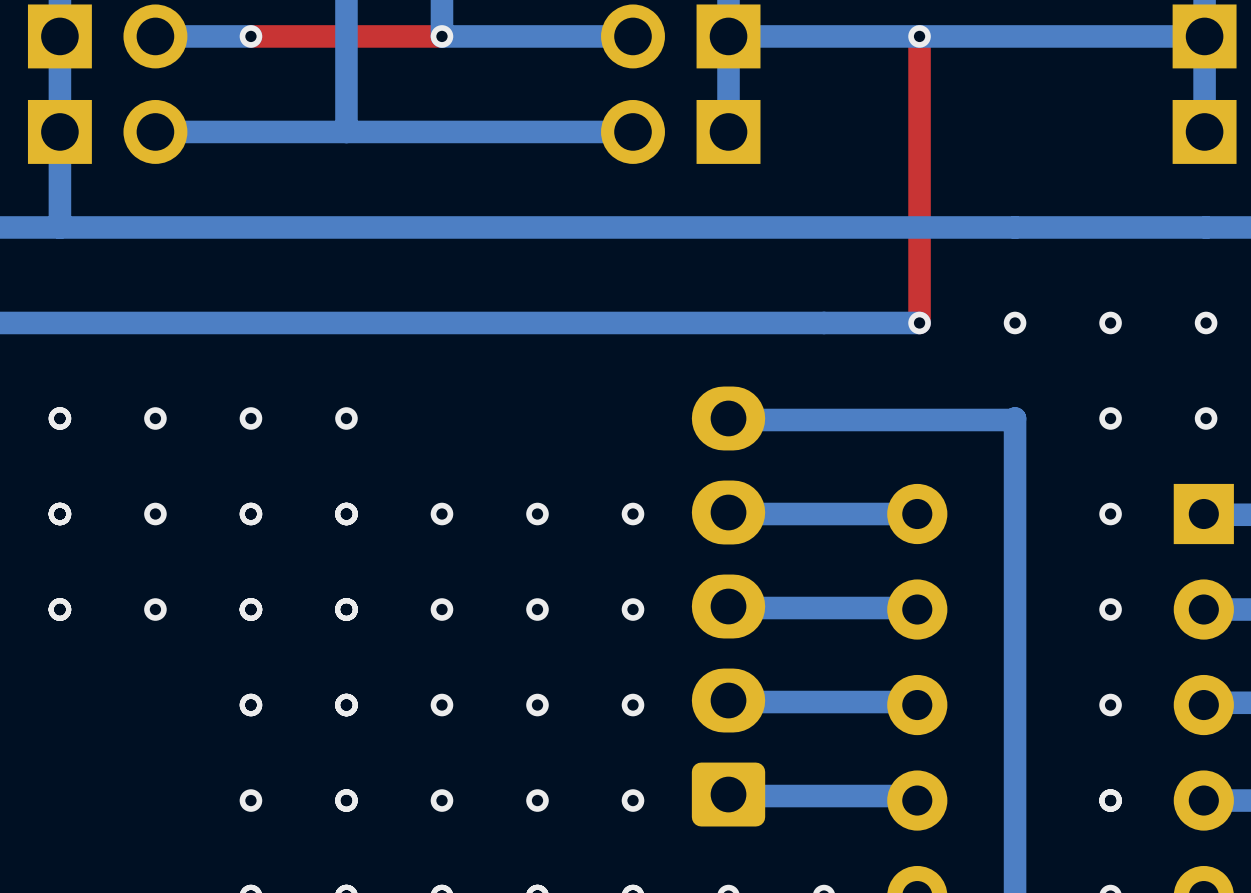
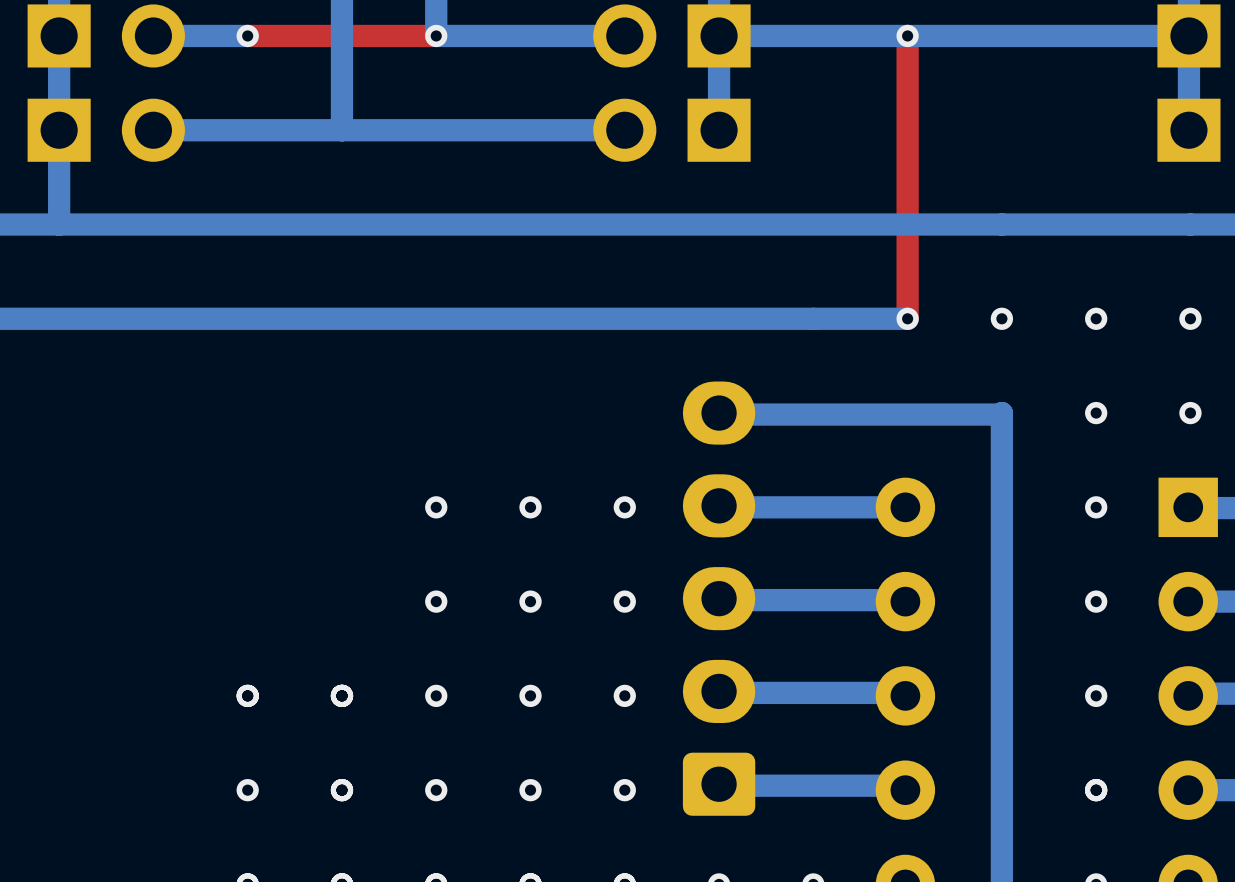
via: (59, 418) -> none
via: (155, 418) -> none
via: (250, 418) -> none
via: (346, 418) -> none
via: (59, 514) -> none
via: (155, 514) -> none
via: (250, 514) -> none
via: (346, 514) -> none
via: (59, 609) -> none
via: (155, 609) -> none
via: (250, 609) -> none
via: (346, 609) -> none

